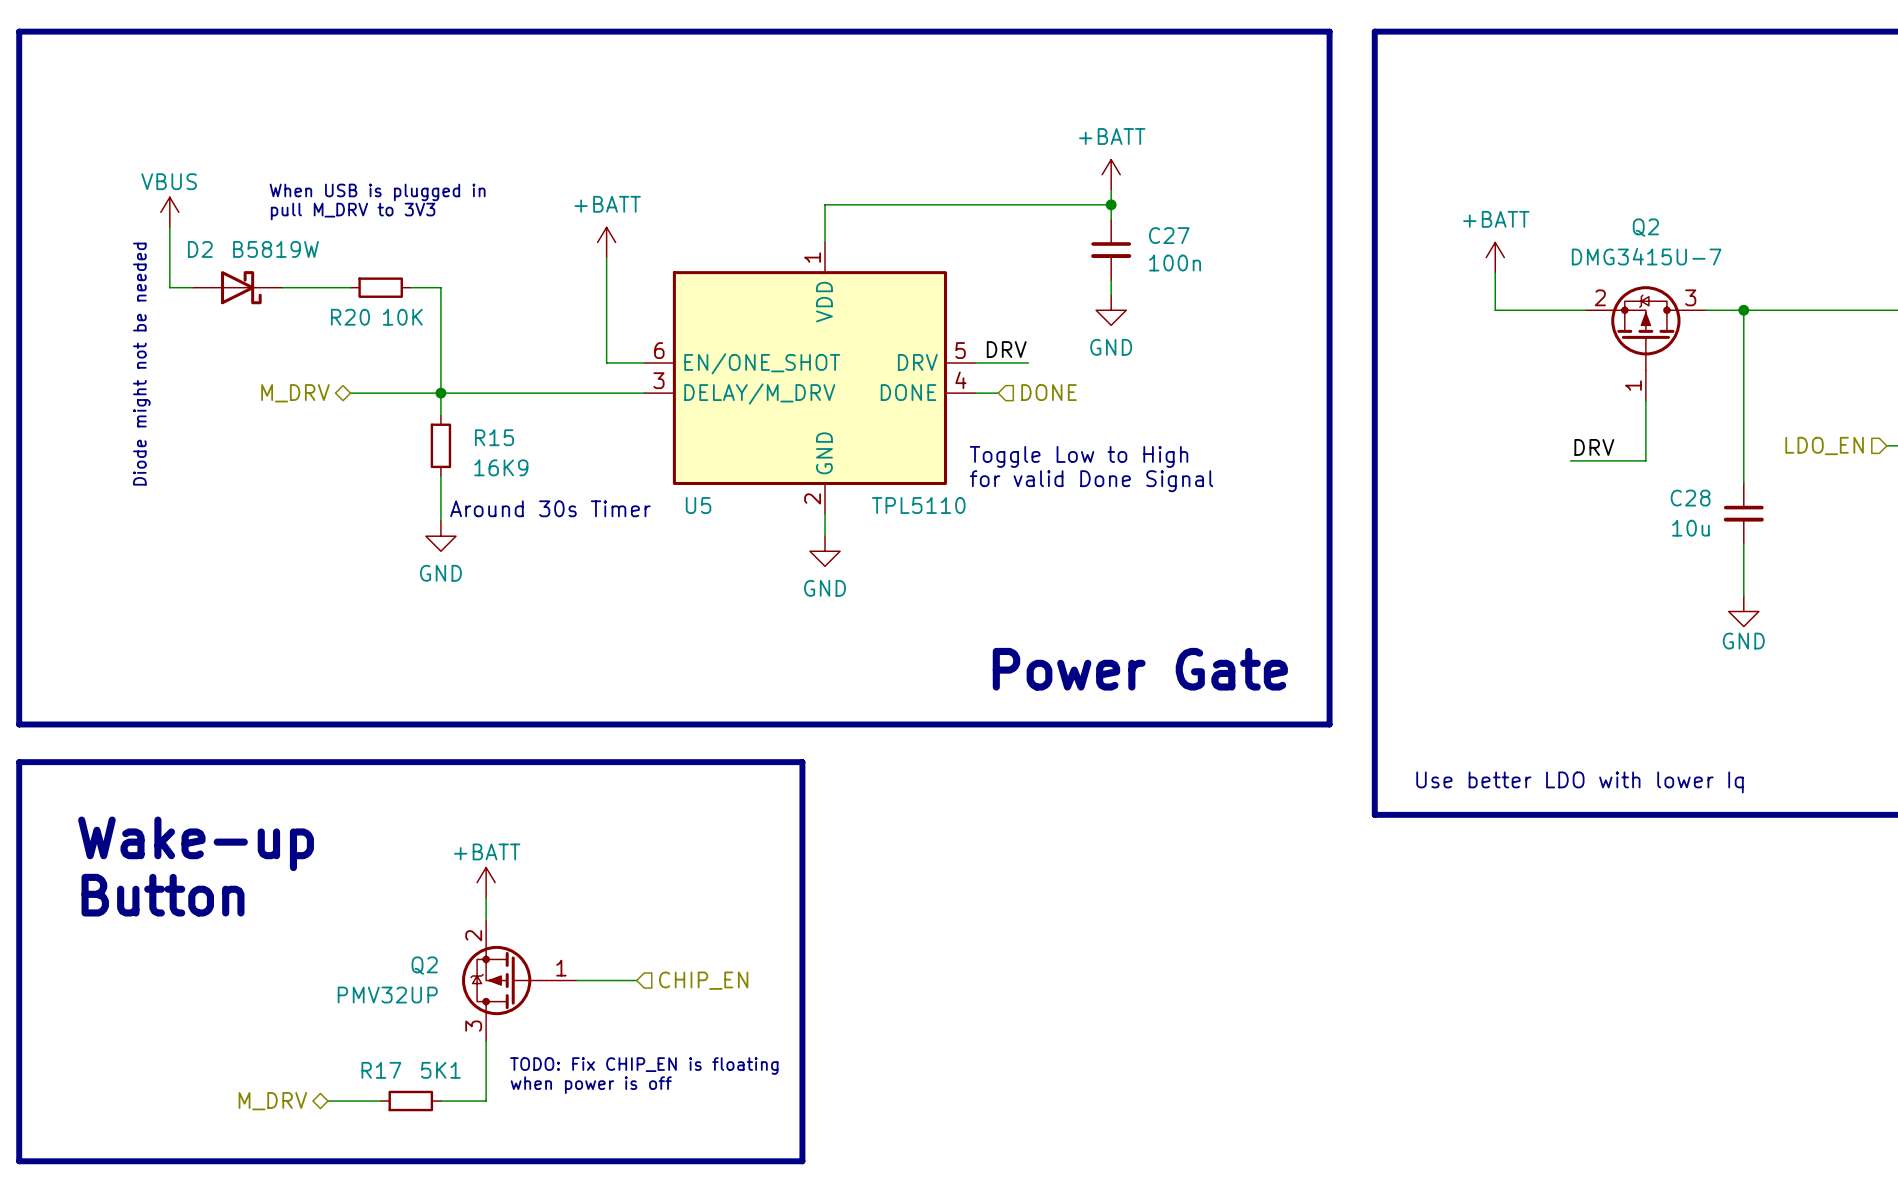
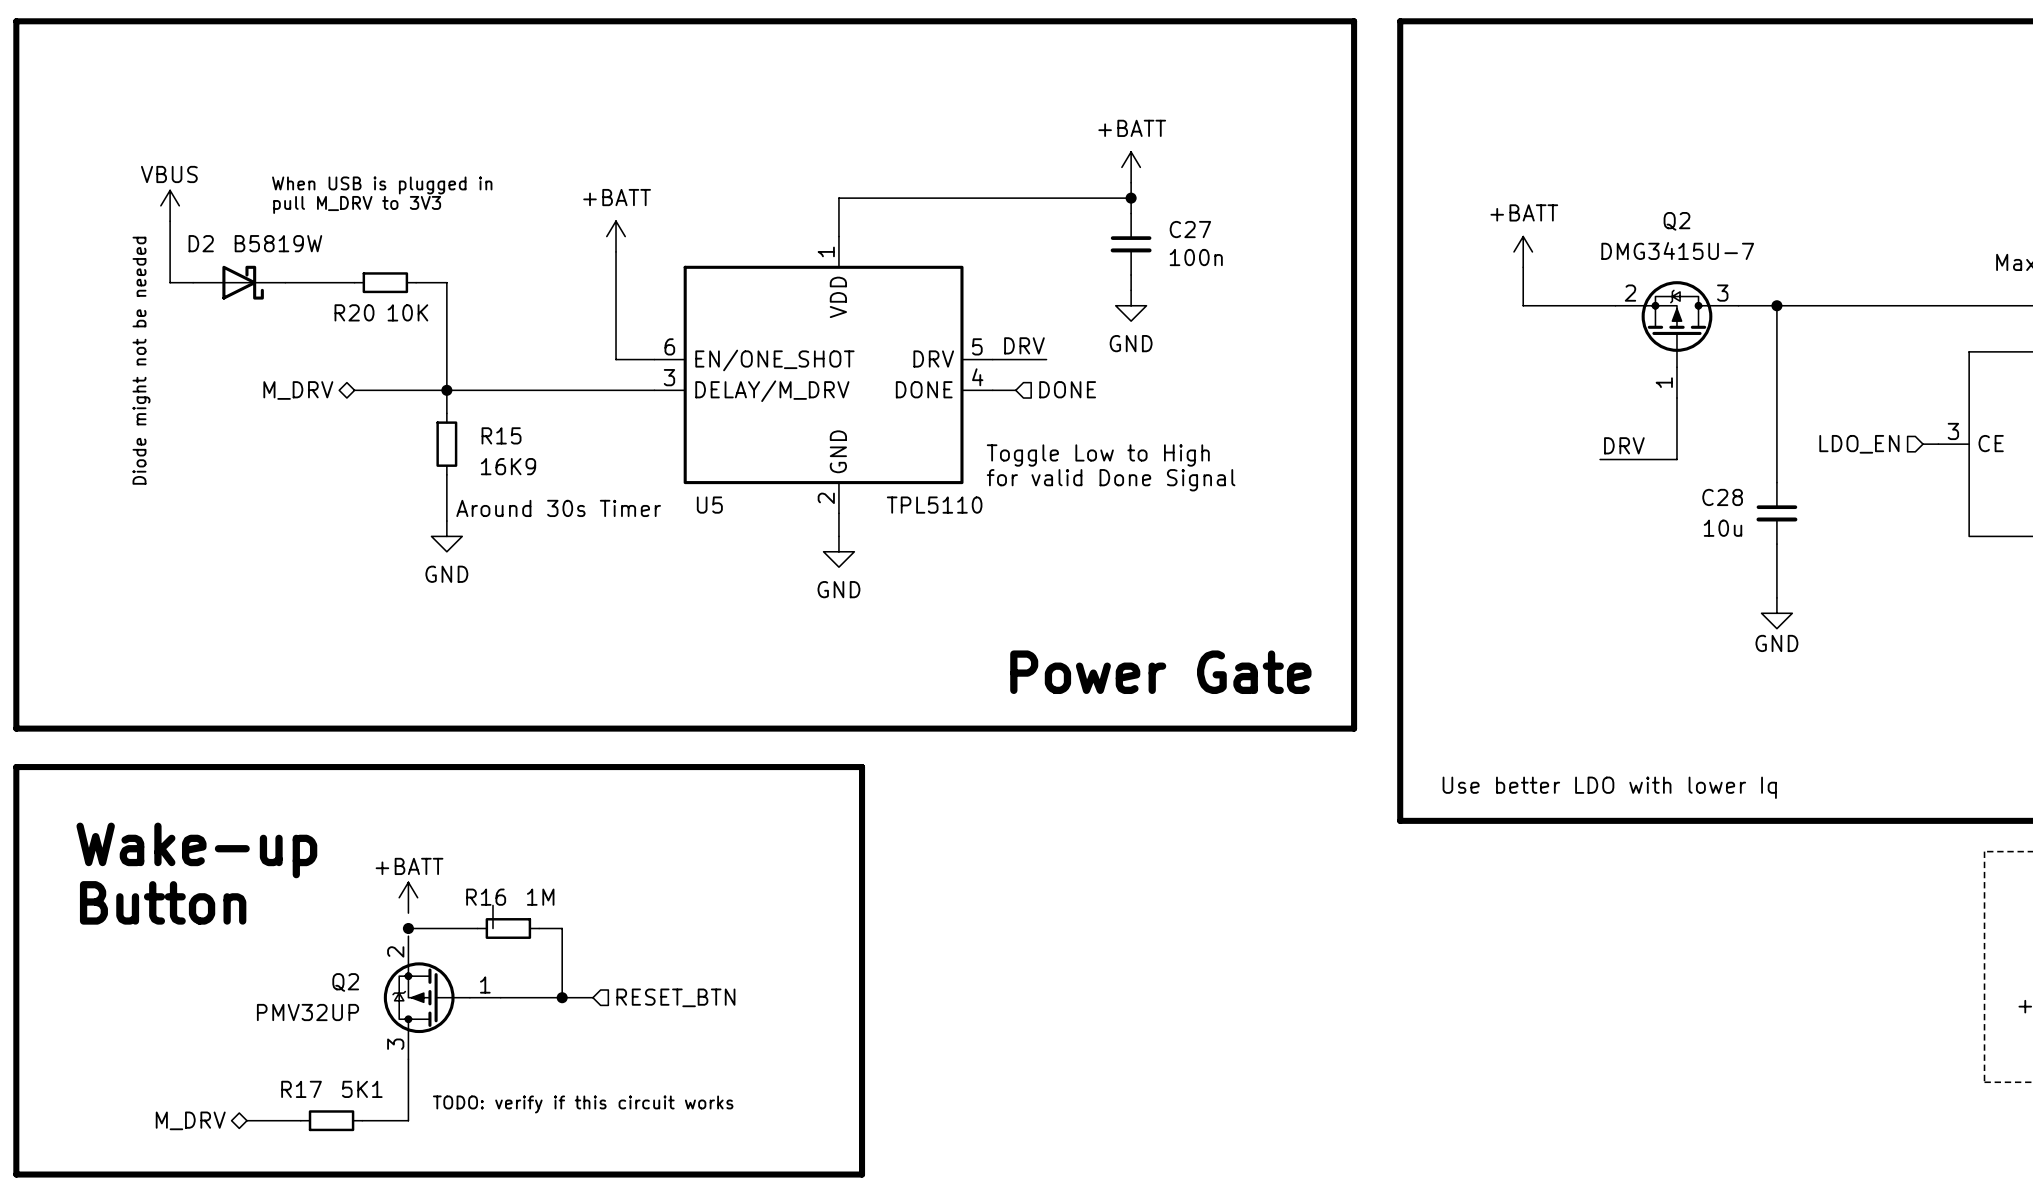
line: (802, 762) (802, 1161) -> (815, 767) (862, 767) (862, 1174) (815, 1174)
power symbol position: +BATT (486, 882) -> +BATT (408, 897)
wire: none -> (408, 928) (477, 928)
junction: none -> (408, 928)
R16: none -> 1M (508, 928)
wire: none -> (539, 928) (562, 928) (562, 997)
Q2 position: (519, 980) -> (442, 997)
wire: (576, 980) (636, 980) -> none
hierarchical label: CHIP_EN (703, 980) -> none
wire: none -> (500, 997) (592, 997)
junction: none -> (562, 997)
hierarchical label: none -> RESET_BTN (675, 997)
wire: (486, 1040) (486, 1101) (440, 1101) -> (408, 1059) (408, 1120) (362, 1120)
text: TODO: Fix CHIP_EN is floating (644, 1066) -> none
text: when power is off (591, 1085) -> none
text: none -> TODO: verify if this circuit works (583, 1104)
hierarchical label position: M_DRV (272, 1101) -> M_DRV (190, 1120)
wire: (327, 1101) (380, 1101) -> (246, 1120) (300, 1120)
R17 position: (410, 1101) -> (331, 1120)

